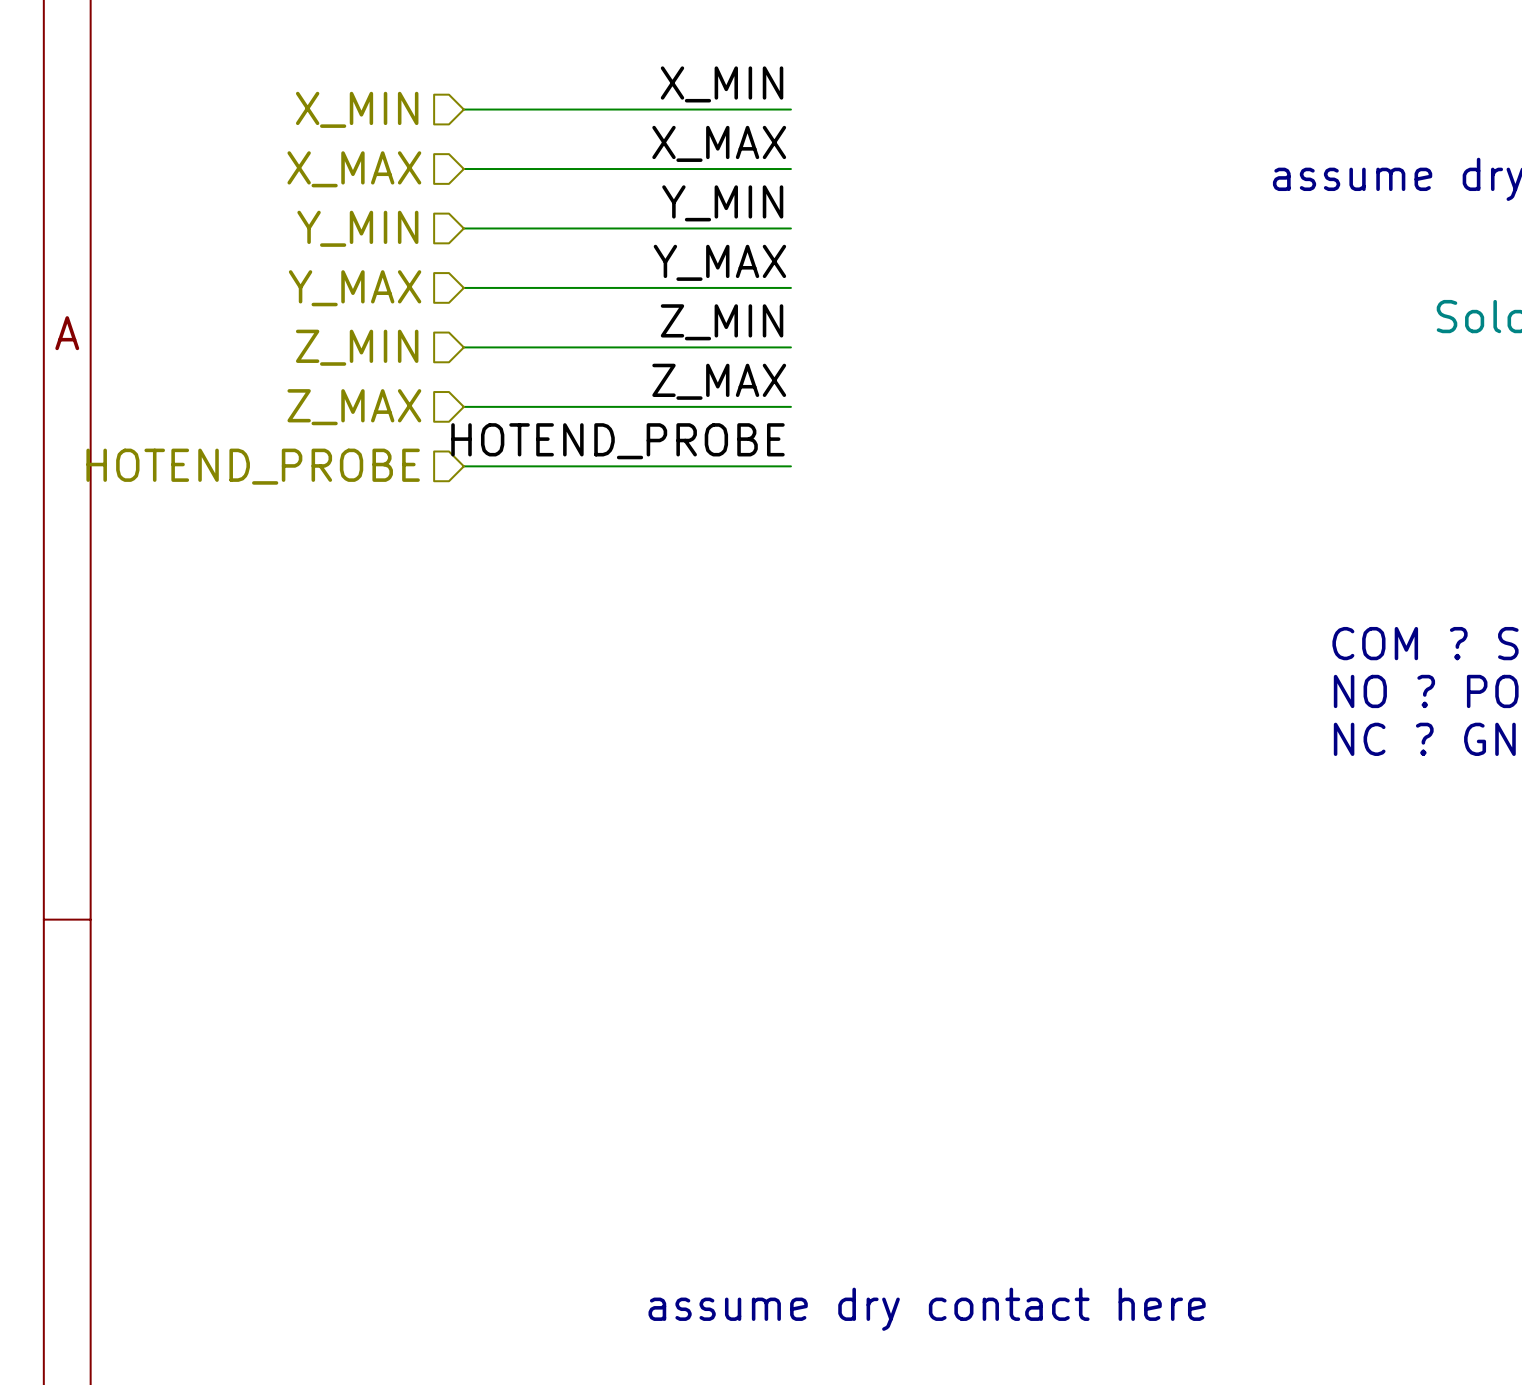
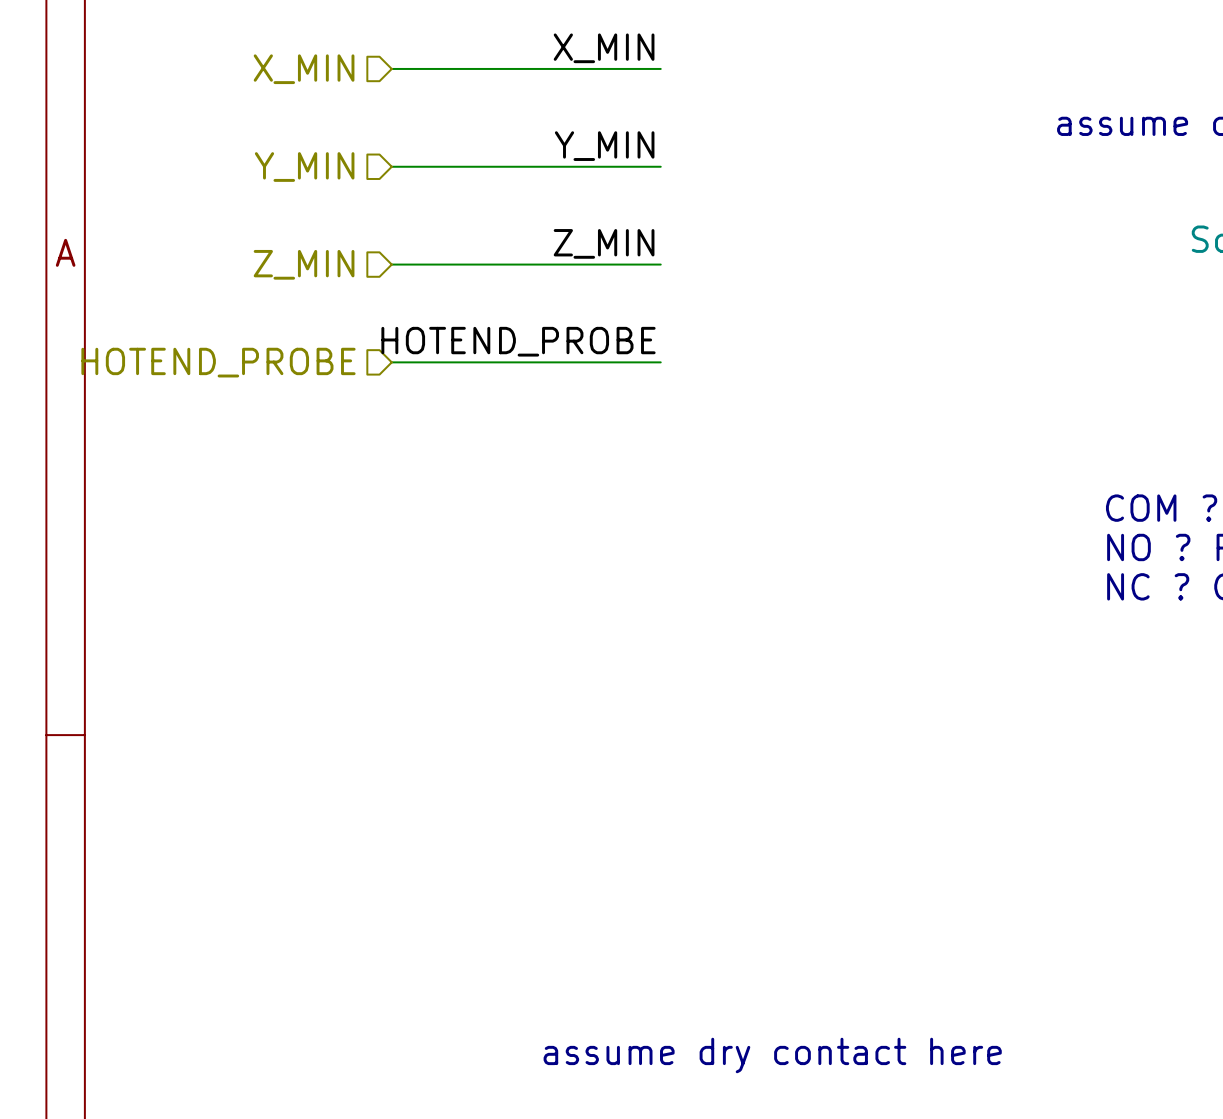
label: X_MAX (719, 143) -> none
hierarchical label: X_MAX (354, 169) -> none
wire: (463, 169) (790, 169) -> none
label: Y_MAX (719, 262) -> none
wire: (463, 287) (790, 287) -> none
hierarchical label: Y_MAX (355, 288) -> none
label: Z_MAX (719, 381) -> none
wire: (463, 406) (790, 406) -> none
hierarchical label: Z_MAX (354, 407) -> none

